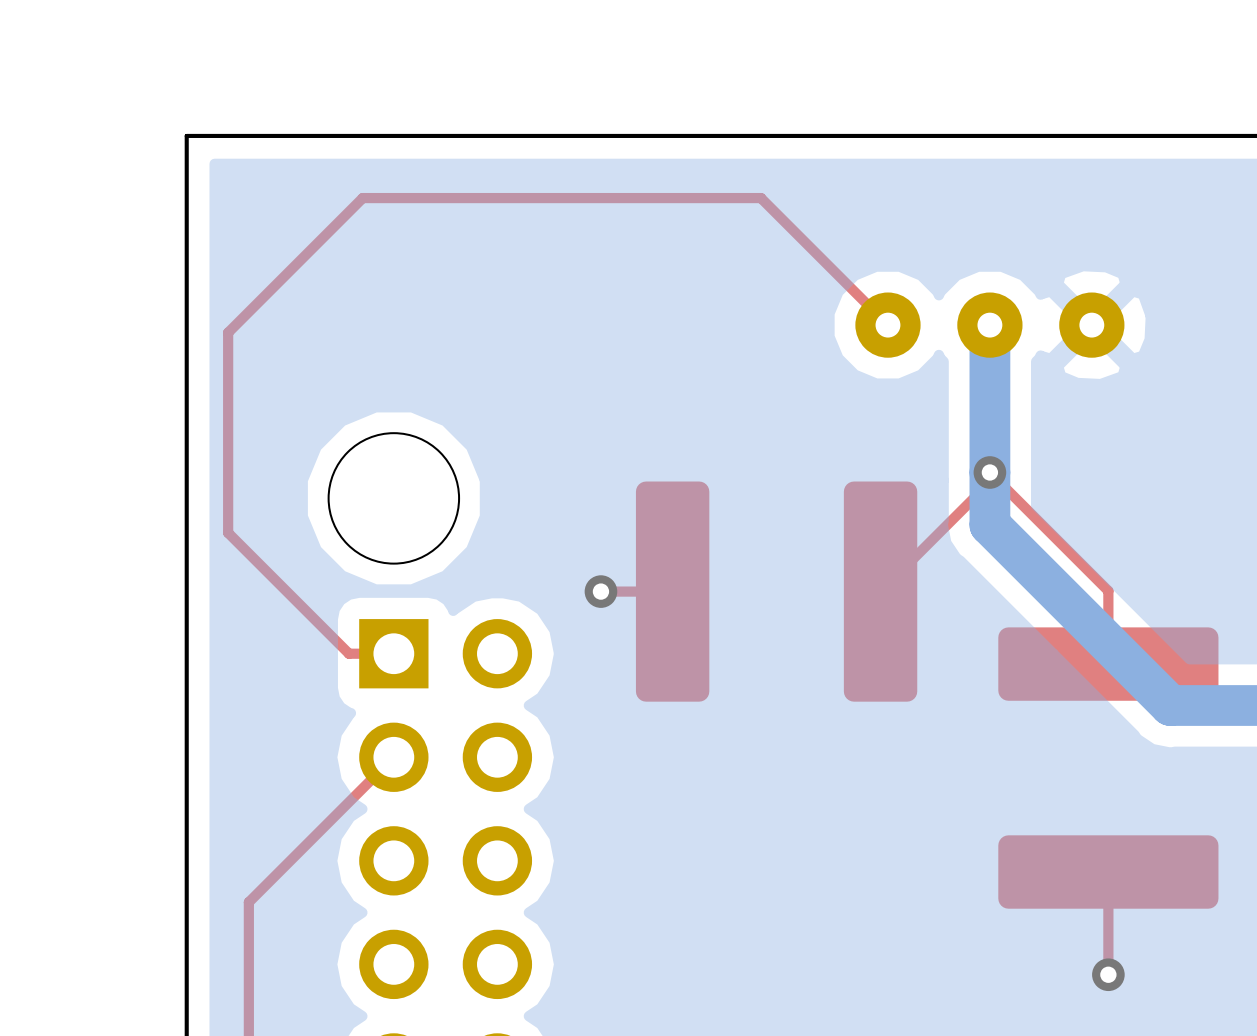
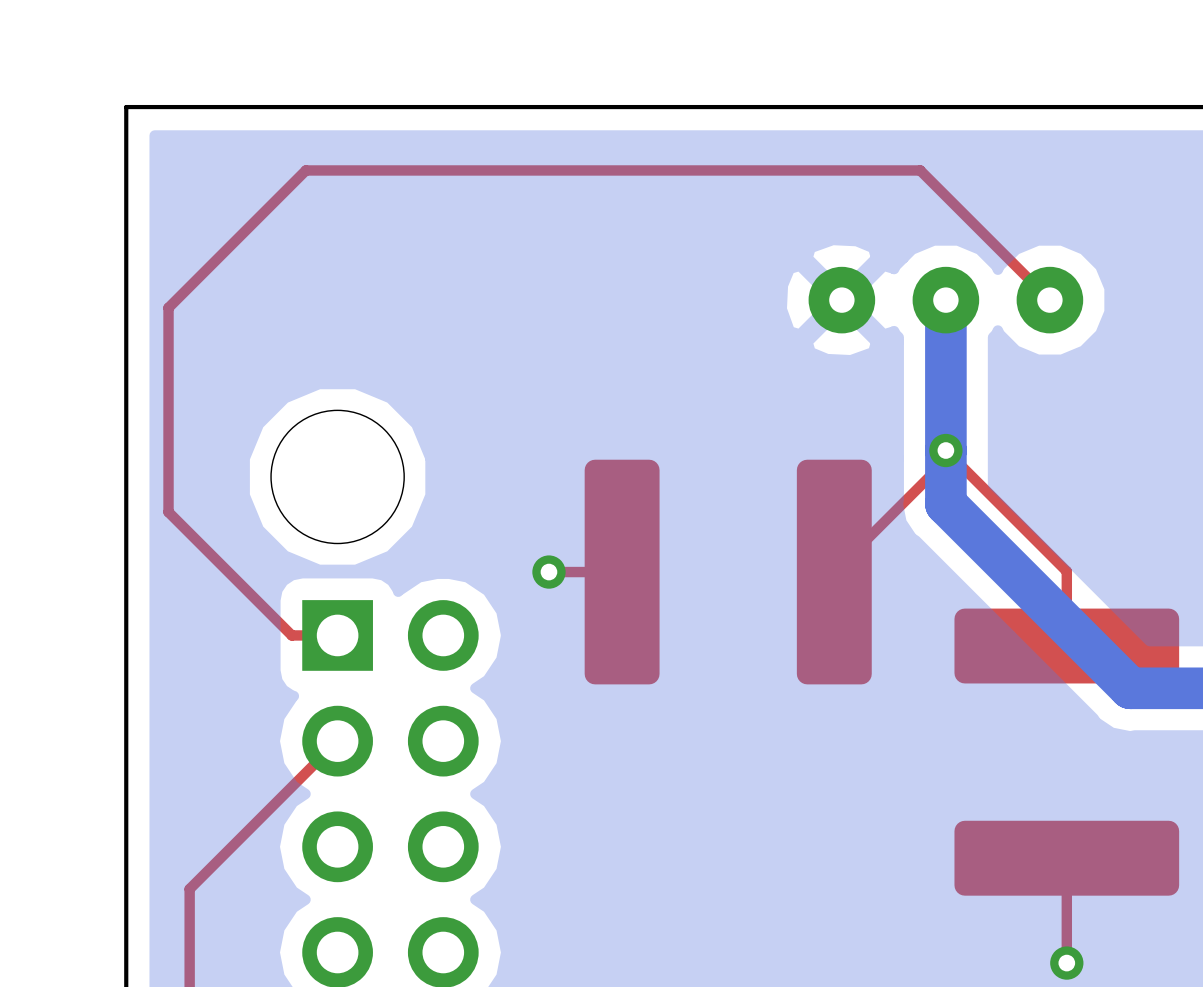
top track: (760, 198) (887, 325) -> (712, 170) (920, 170) (1049, 300)

